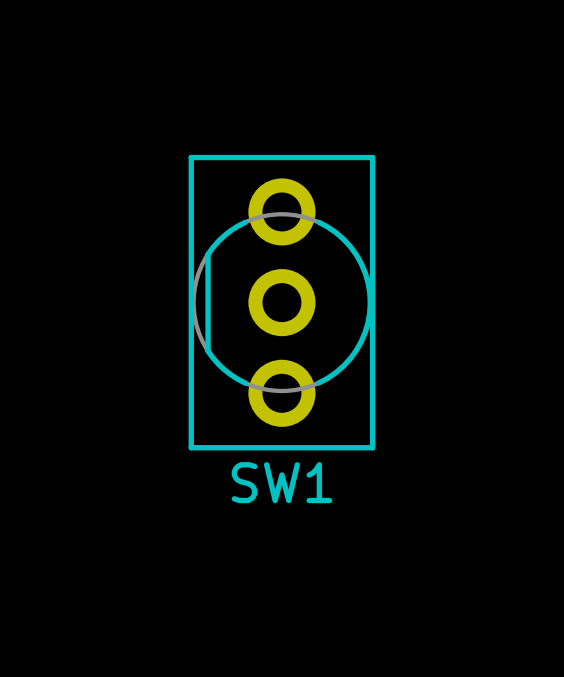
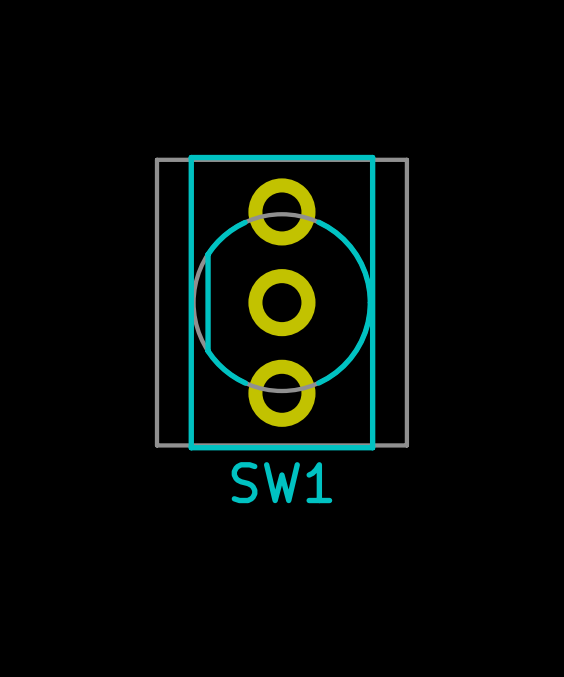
SW1 footprint: [188, 154, 376, 451] -> [154, 154, 410, 451]

